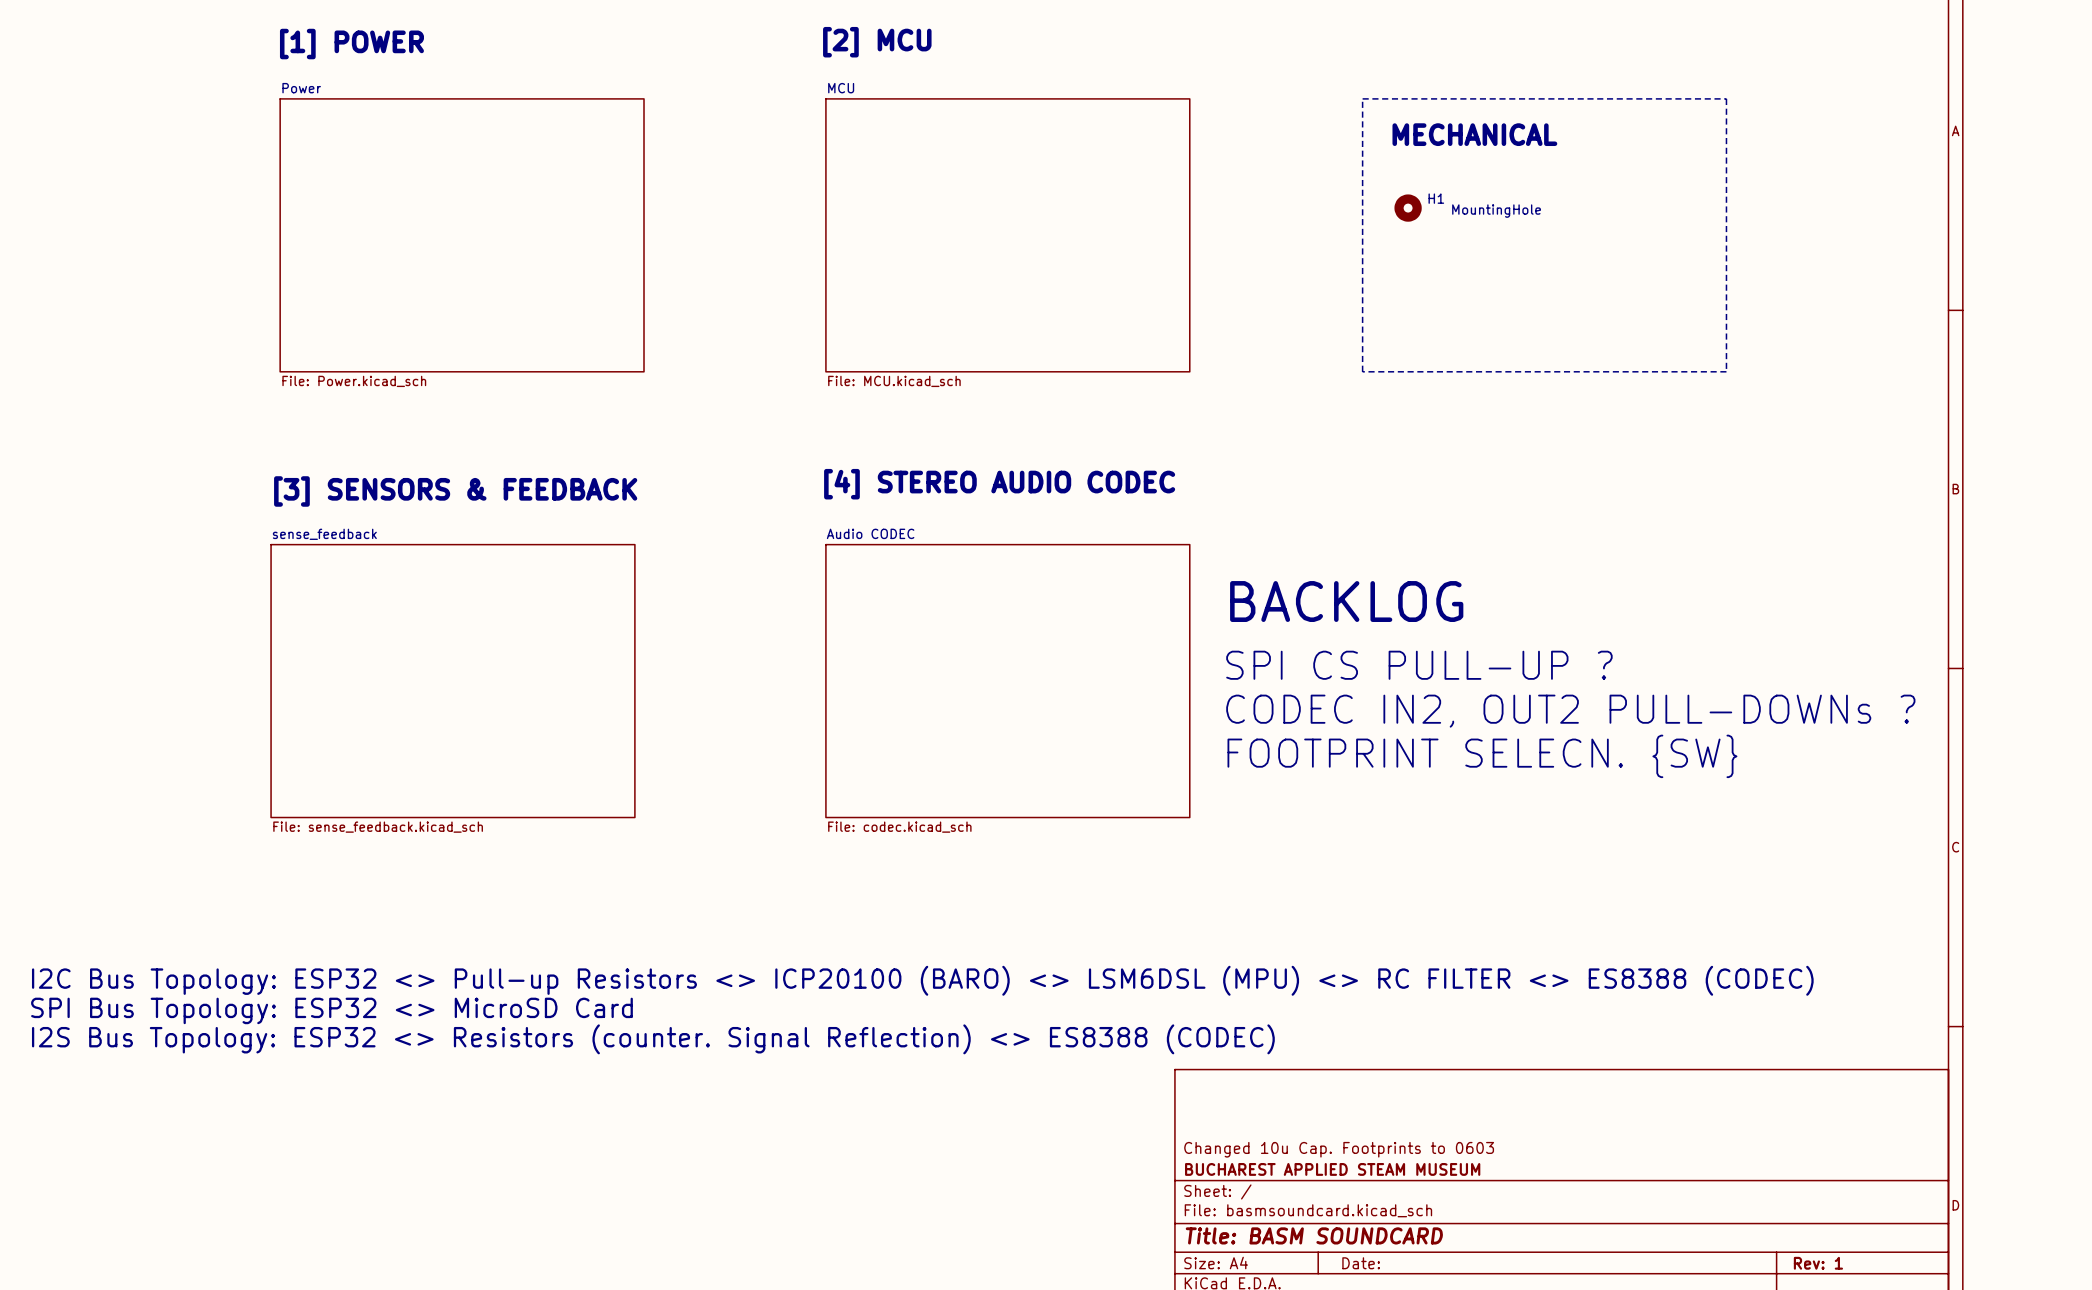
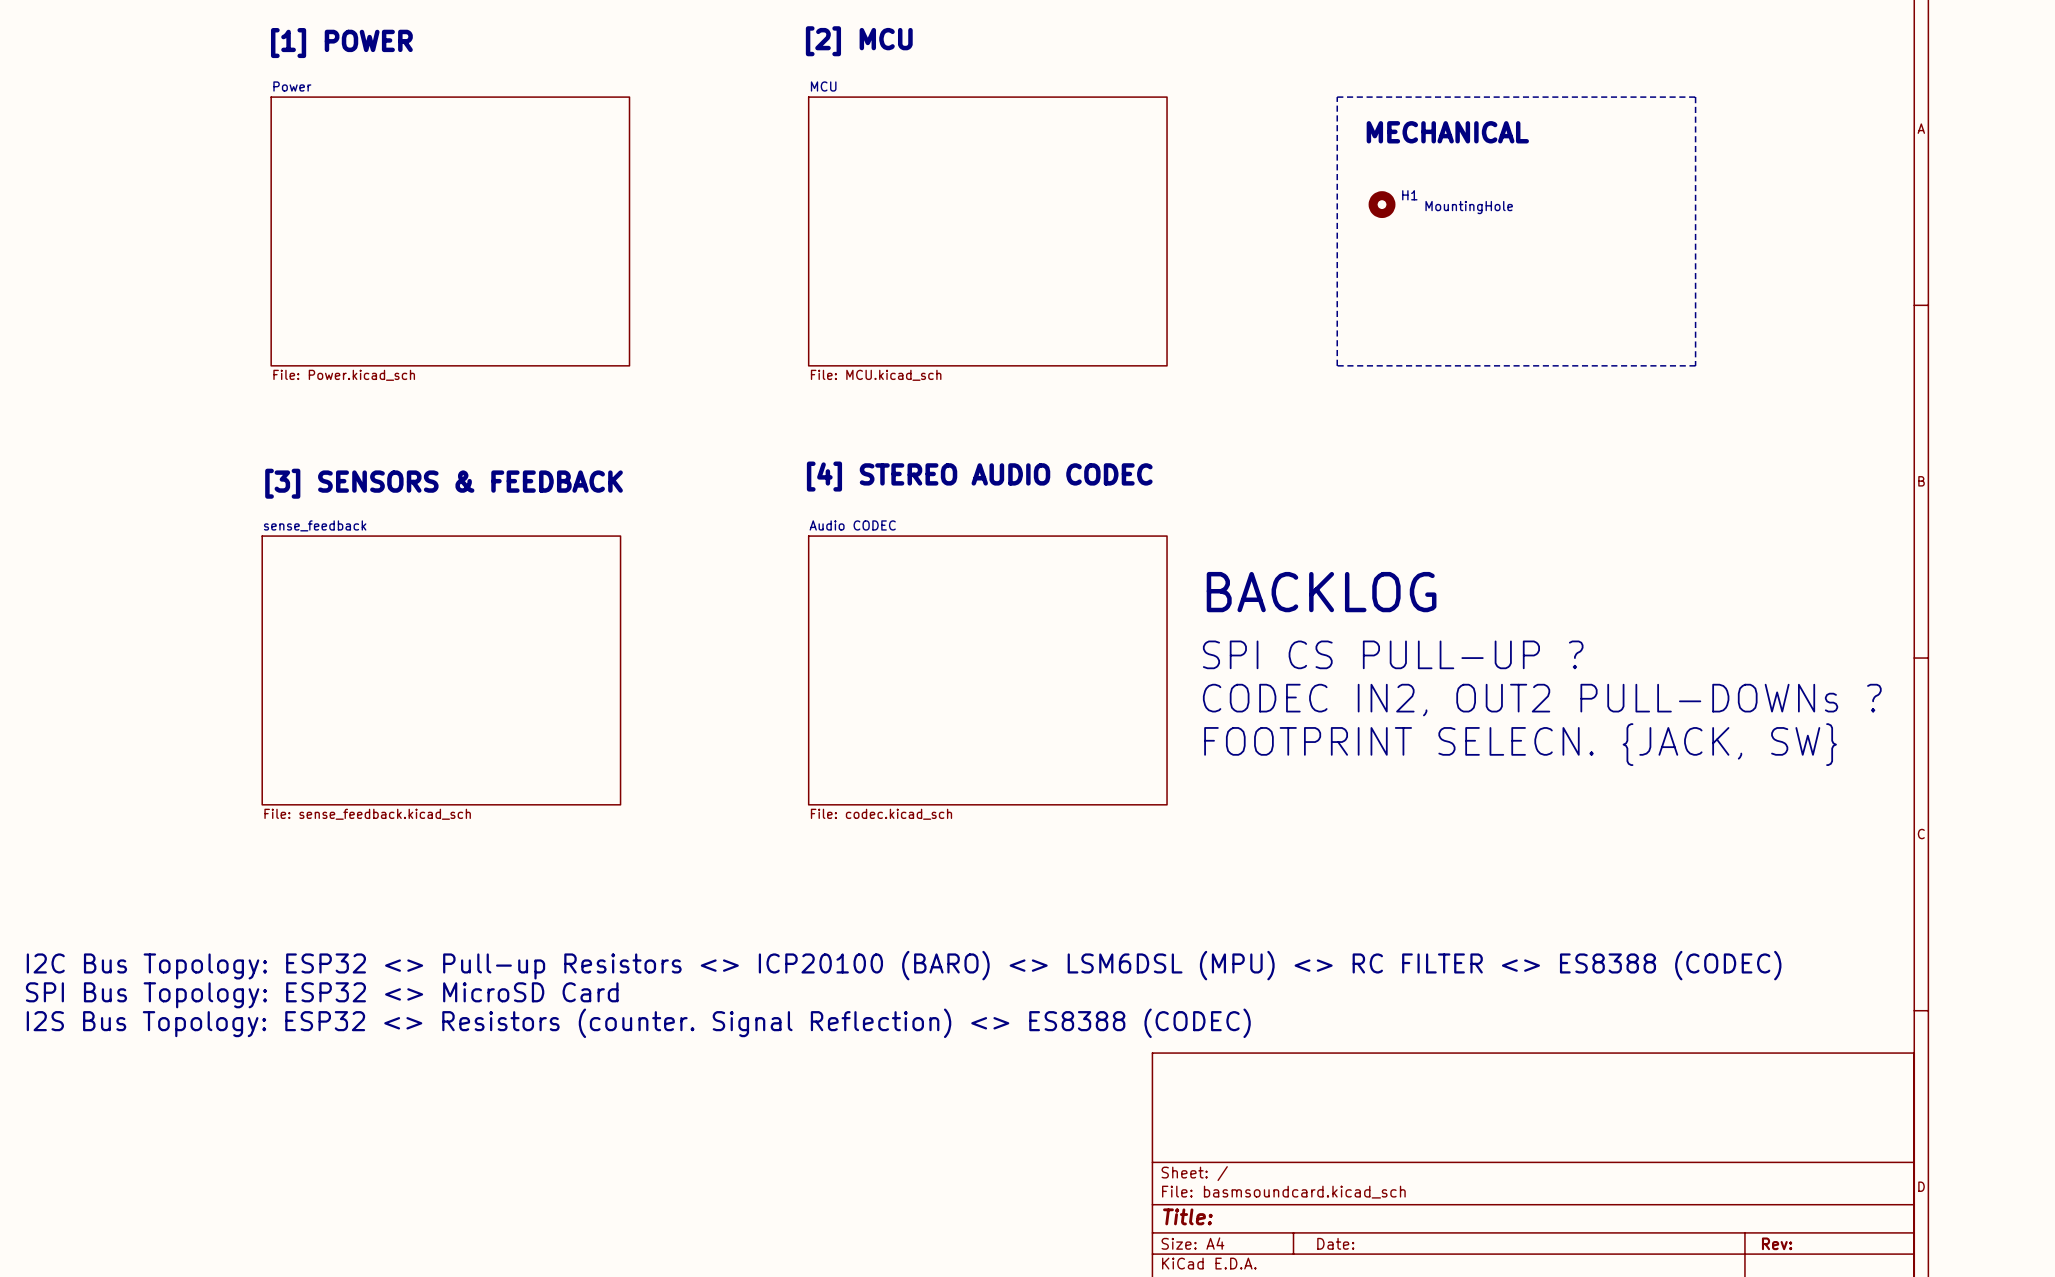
text: FOOTPRINT SELECN. {SW} (1482, 756) -> FOOTPRINT SELECN. {JACK, SW} (1520, 744)
title block: Changed 10u Cap. Footprints to 0603 (1339, 1149) -> none
title block: BUCHAREST APPLIED STEAM MUSEUM (1332, 1169) -> none
title block: Title: BASM SOUNDCARD (1314, 1235) -> Title: (1187, 1216)
title block: Rev: 1 (1818, 1263) -> Rev: (1777, 1243)

